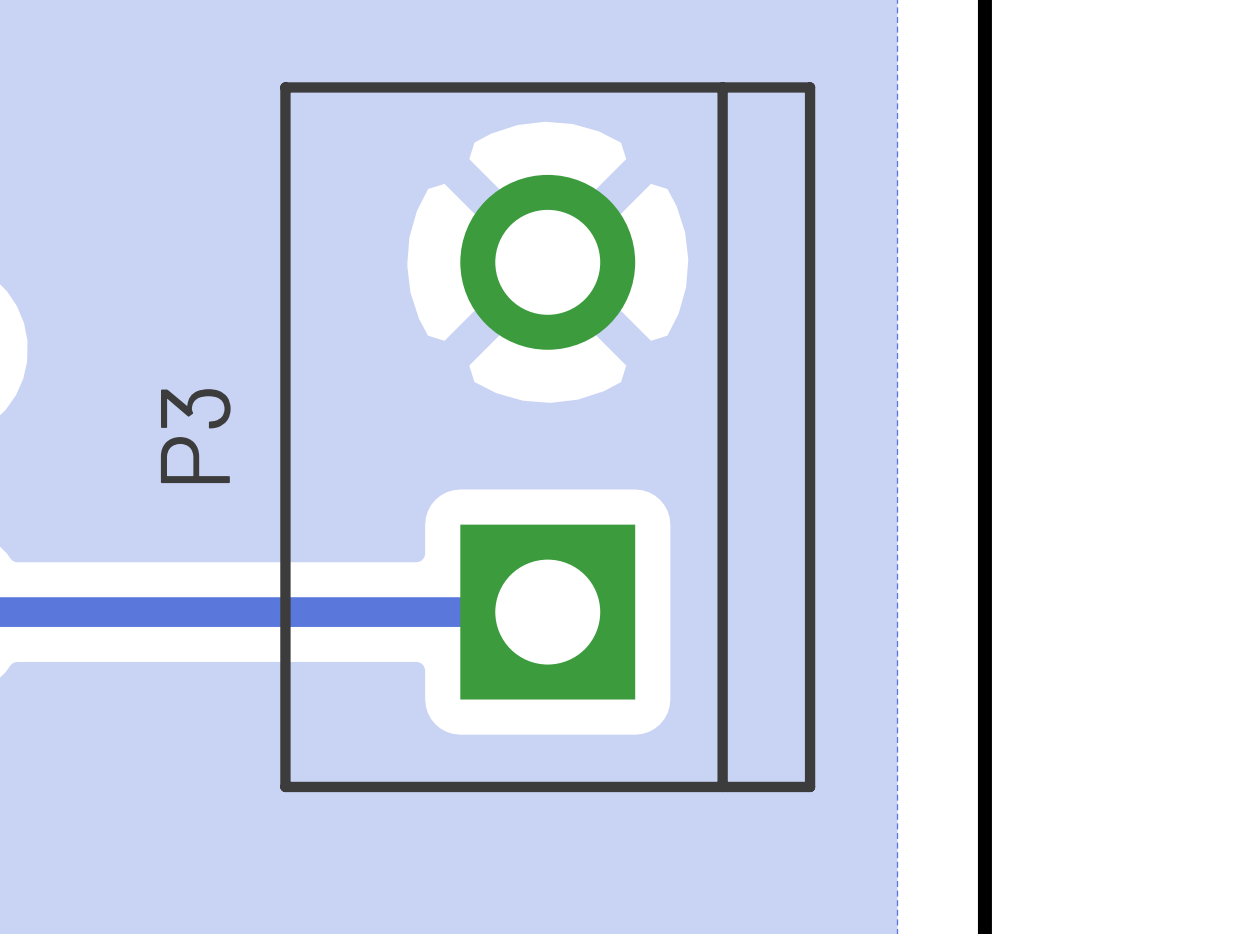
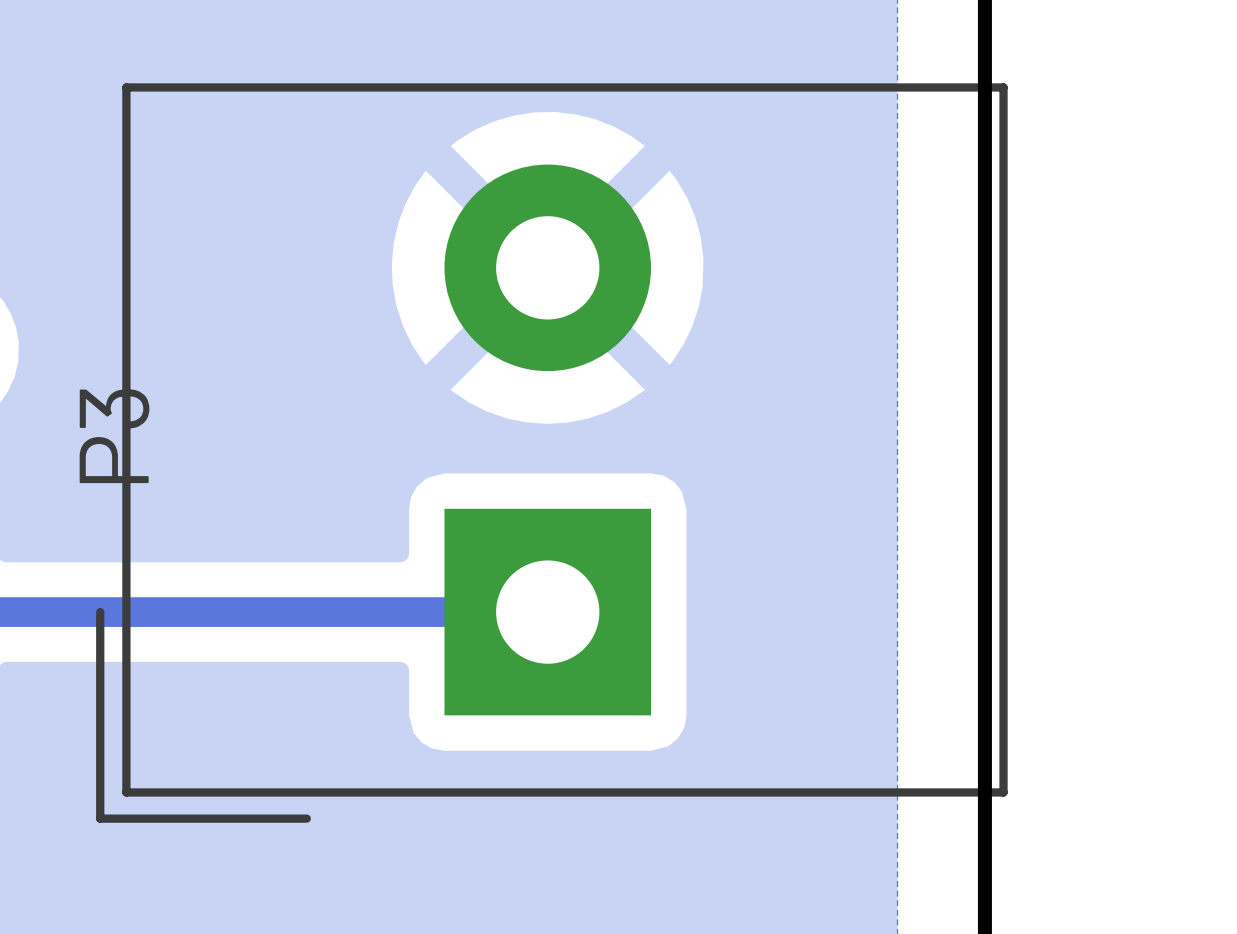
P3 footprint: [280, 82, 816, 793] -> [96, 83, 1008, 823]

